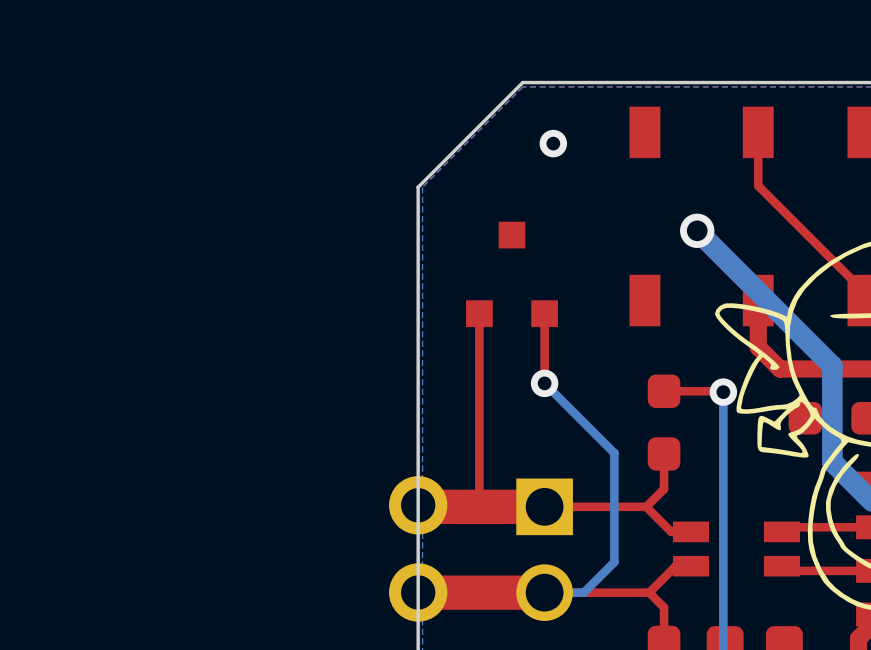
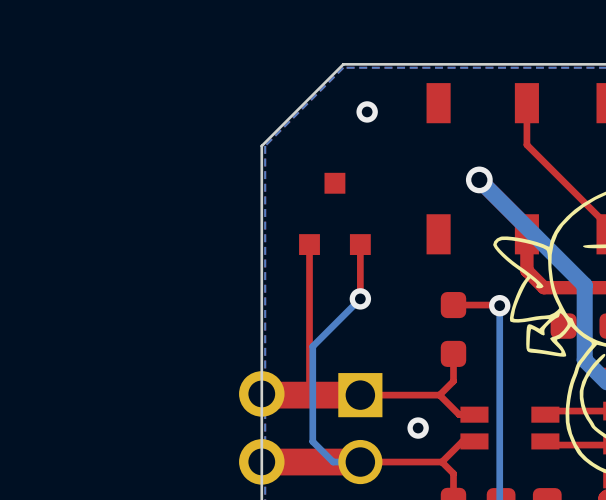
bottom track: (544, 383) (614, 453) (614, 562) (583, 592) (544, 592) -> (360, 298) (312, 346) (312, 441) (333, 462) (360, 462)
via: none -> (418, 428)

